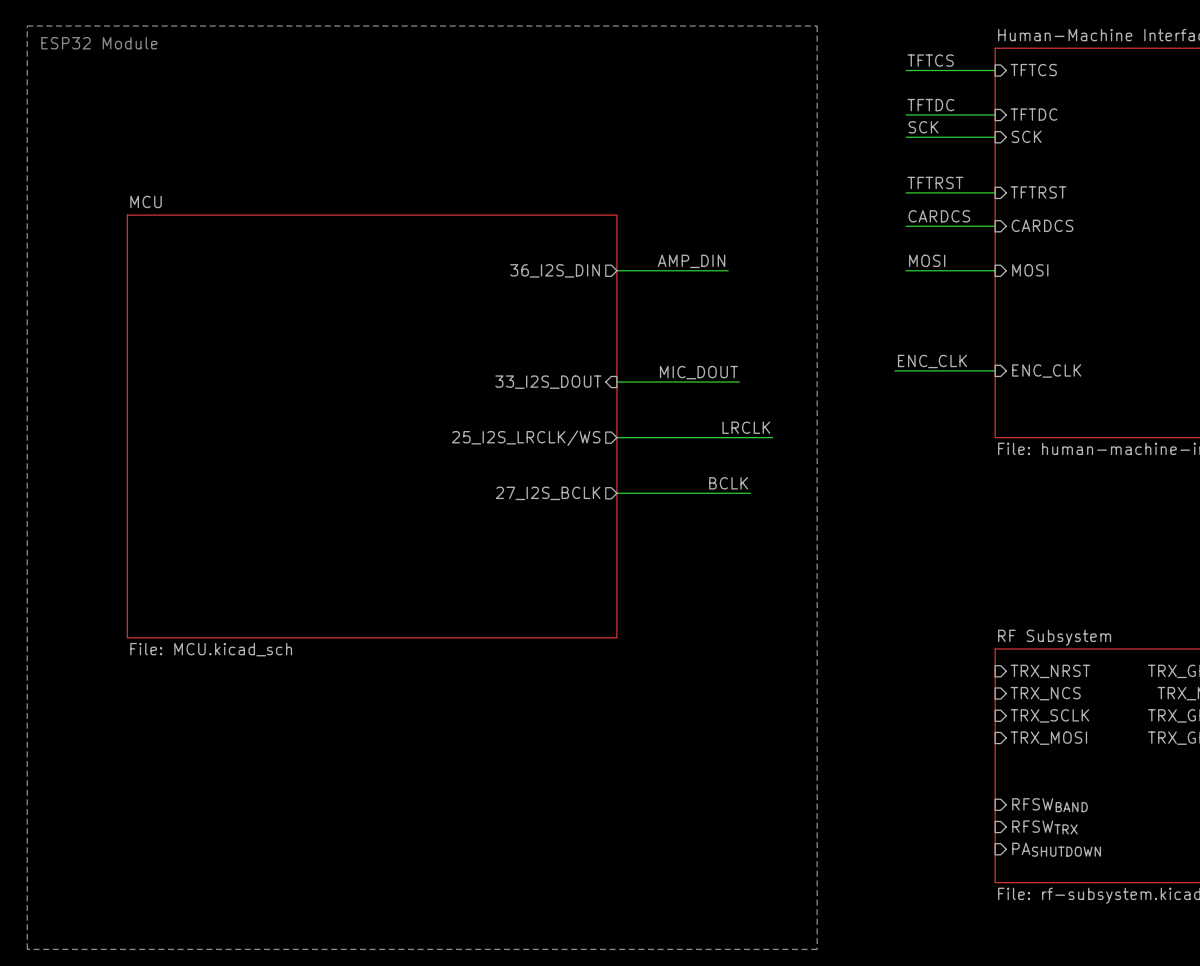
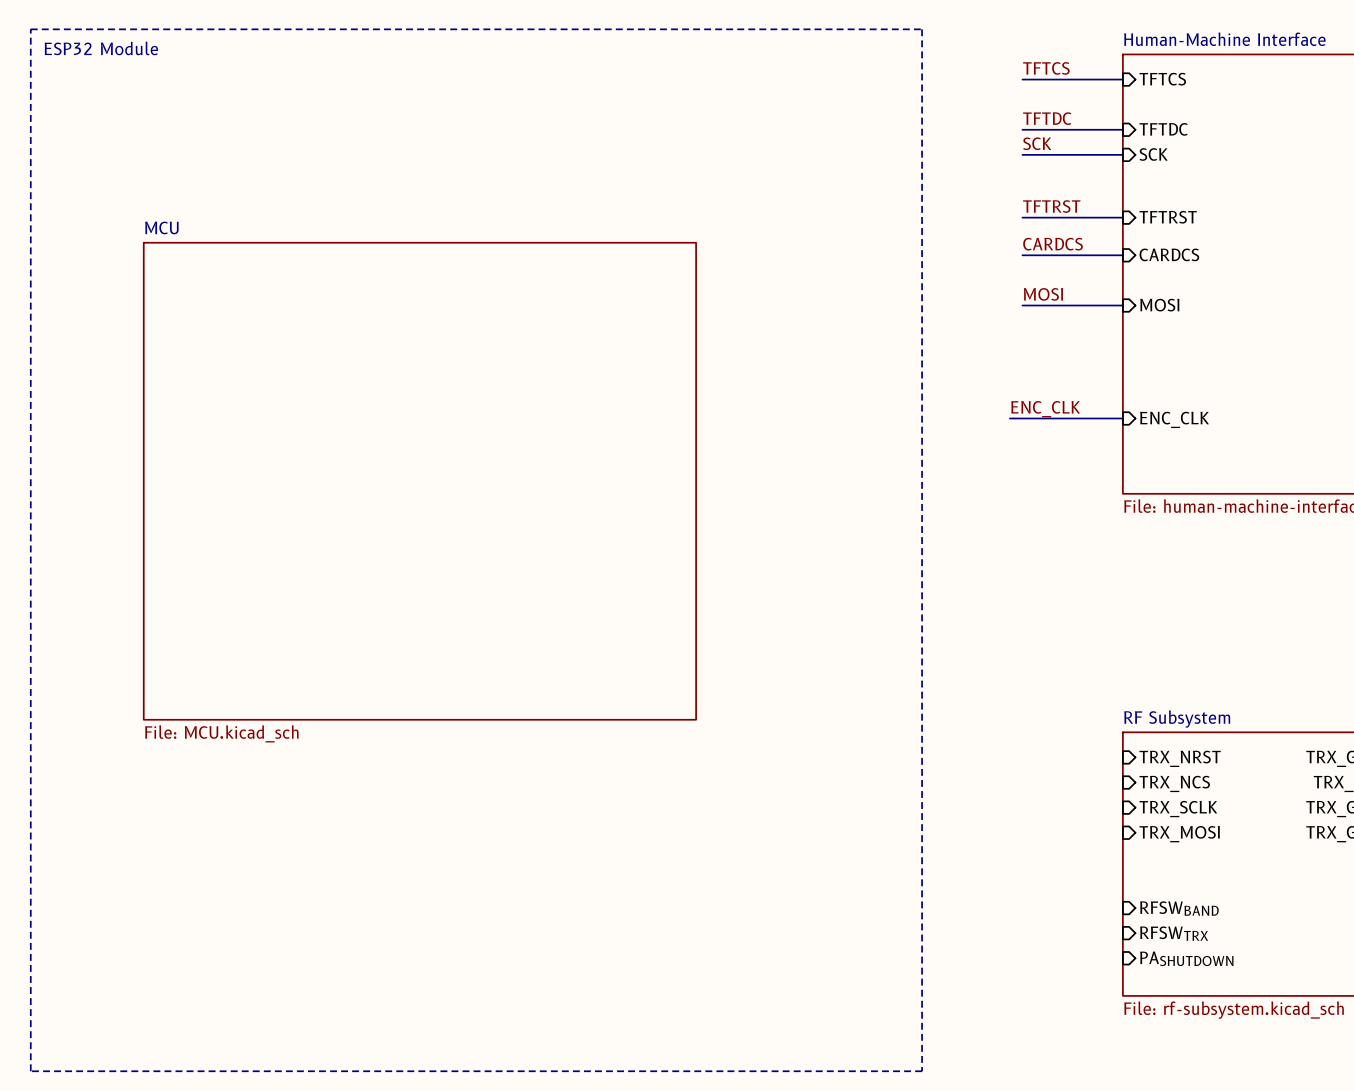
label: AMP_DIN (691, 261) -> none
sheet pin: 36_I2S_DIN (555, 270) -> none
wire: (616, 270) (728, 270) -> none
label: MIC_DOUT (698, 372) -> none
sheet pin: 33_I2S_DOUT (548, 382) -> none
wire: (616, 382) (739, 382) -> none
label: LRCLK (746, 427) -> none
wire: (616, 437) (772, 437) -> none
sheet pin: 25_I2S_LRCLK/WS (526, 438) -> none
label: BCLK (728, 483) -> none
sheet pin: 27_I2S_BCLK (548, 493) -> none
wire: (616, 493) (750, 493) -> none

